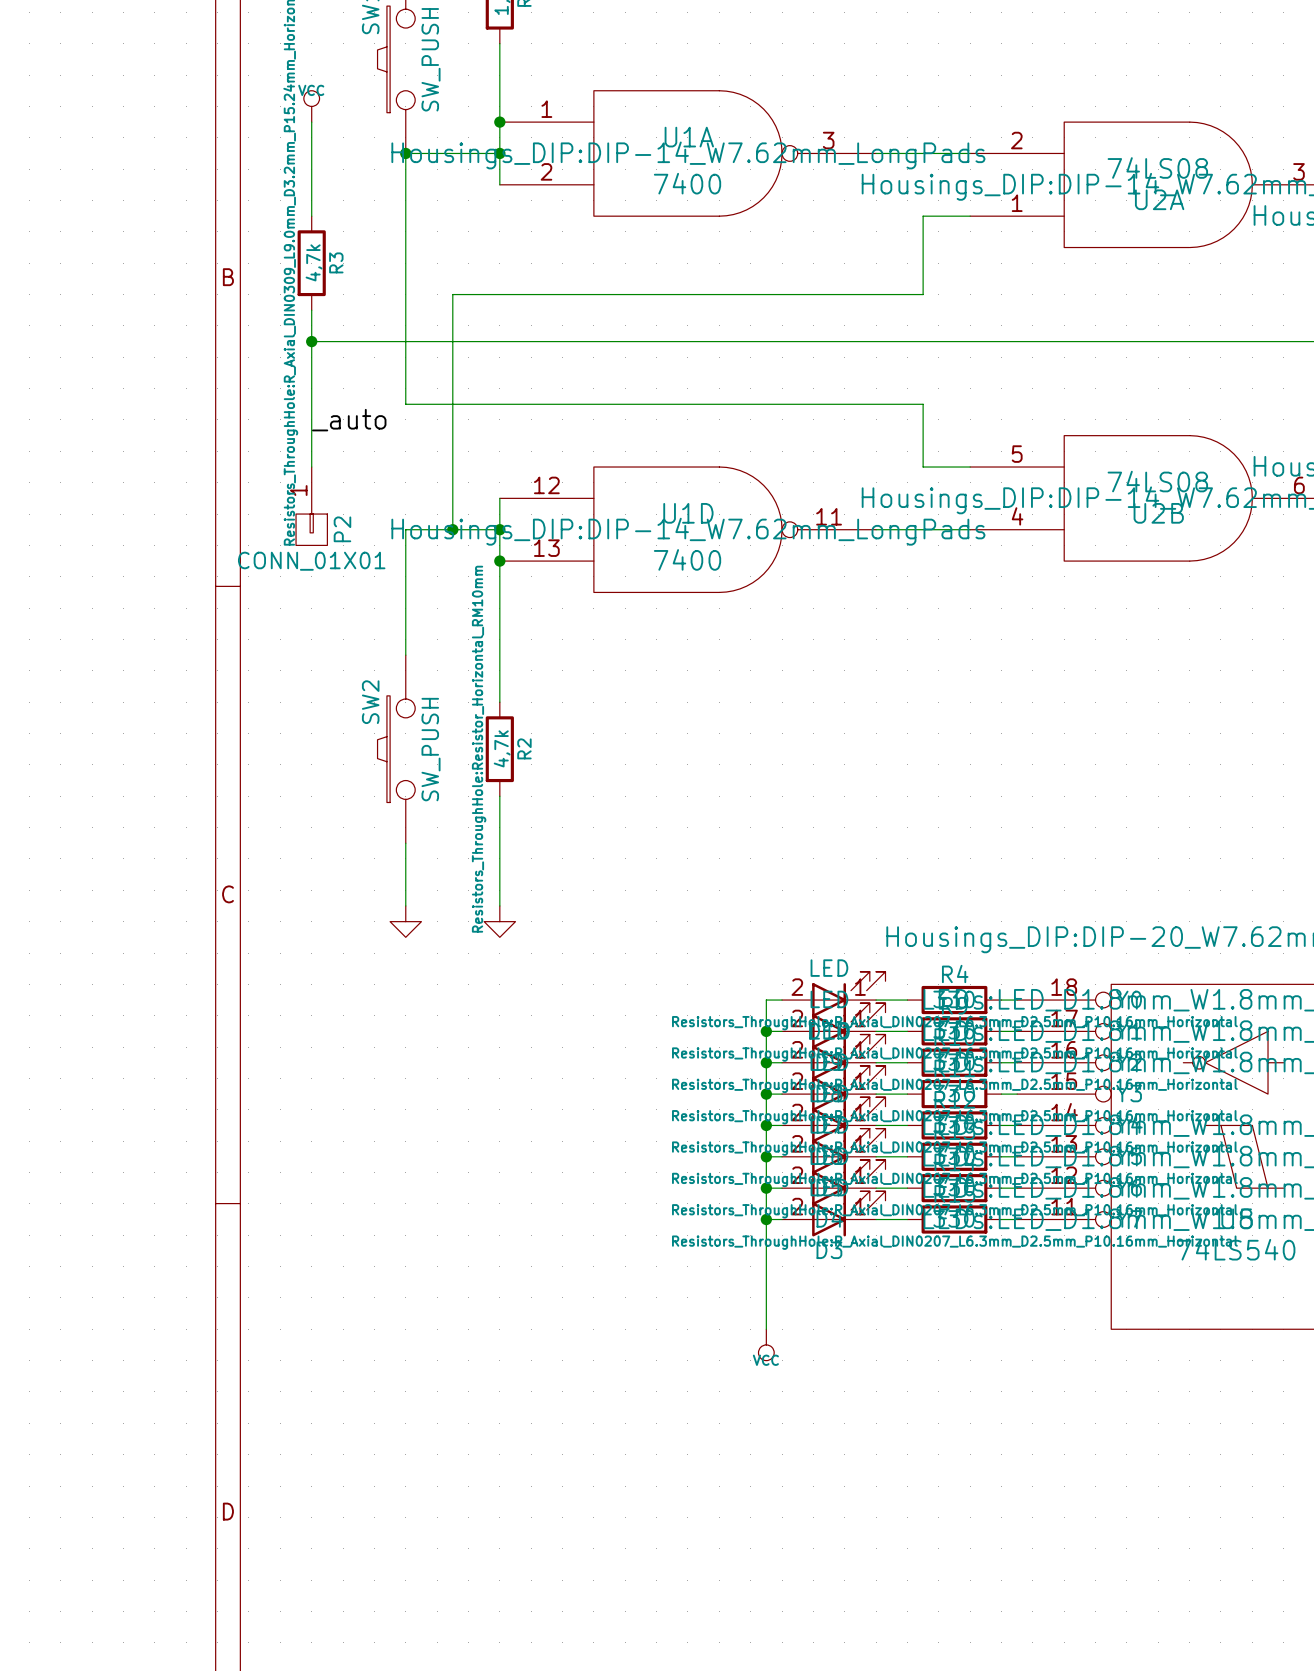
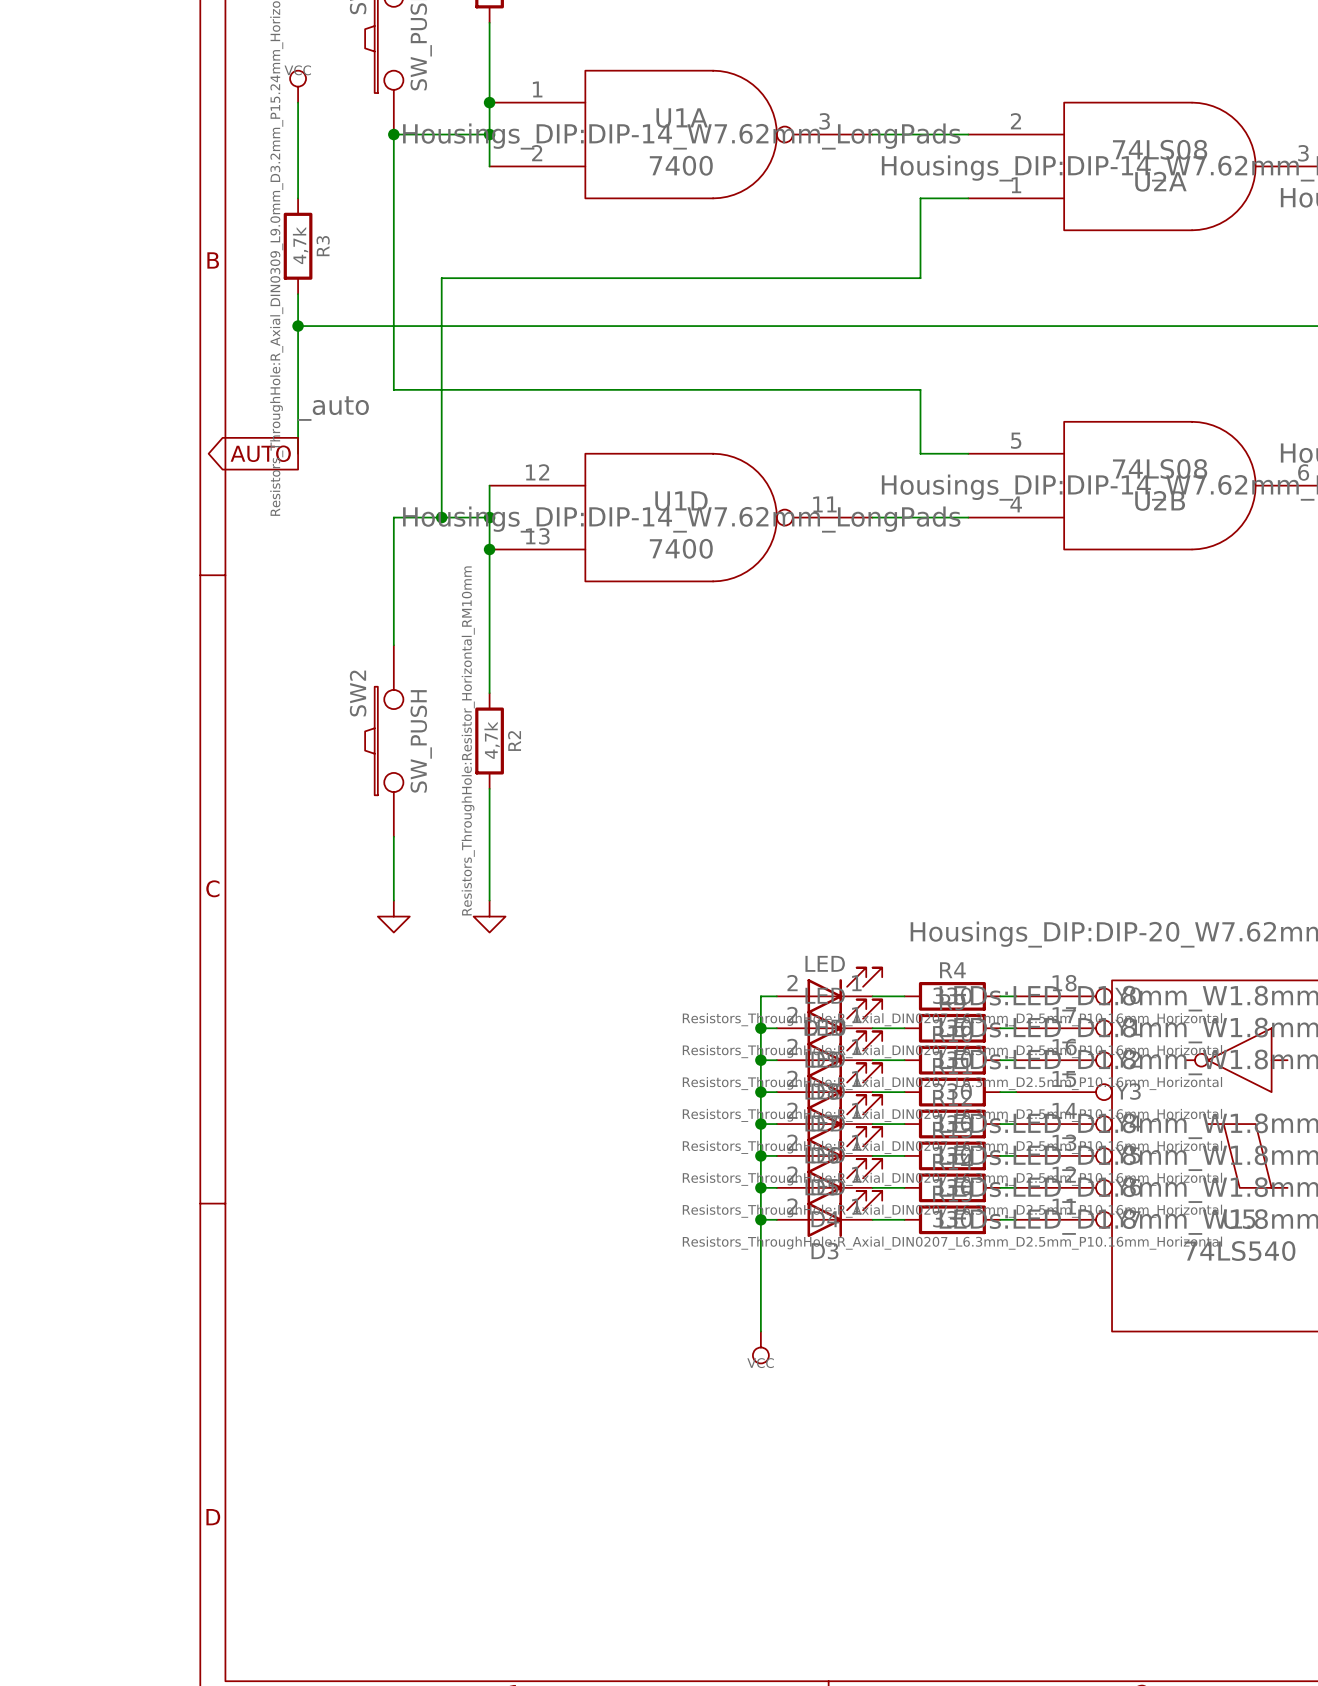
global label: none -> AUTO (260, 453)
P2: CONN_01X01 (311, 506) -> none

